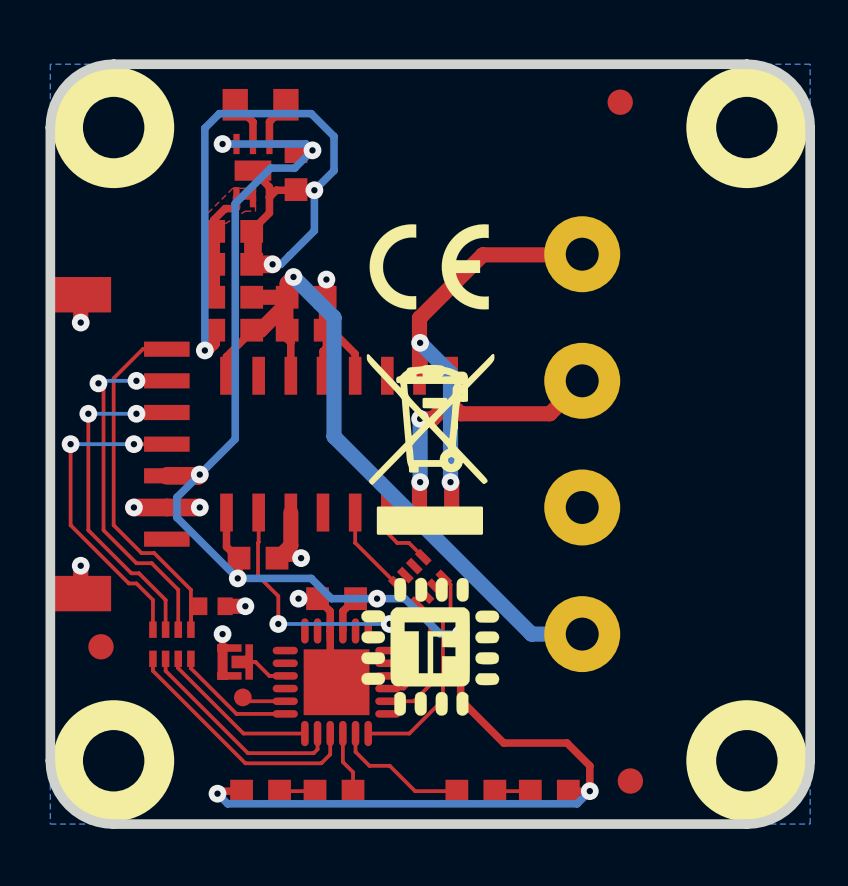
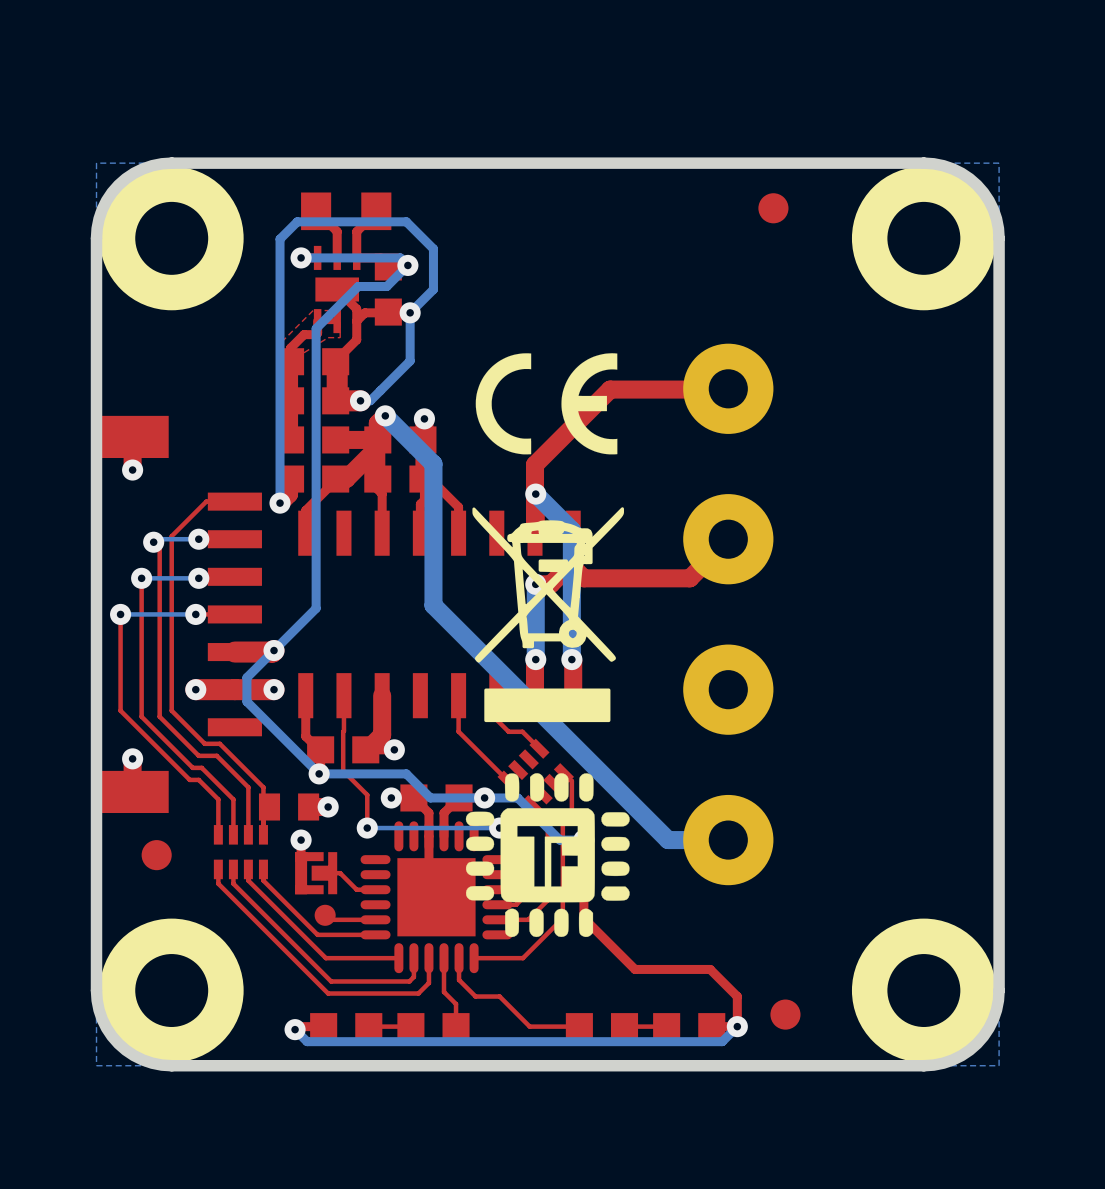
part footprint: [192, 597, 233, 616] -> [258, 793, 320, 821]

